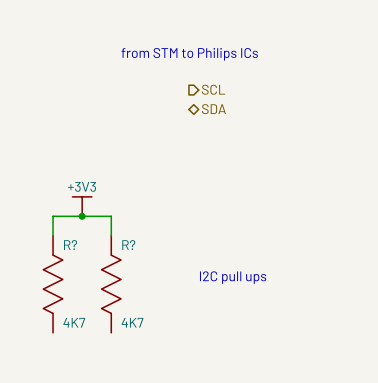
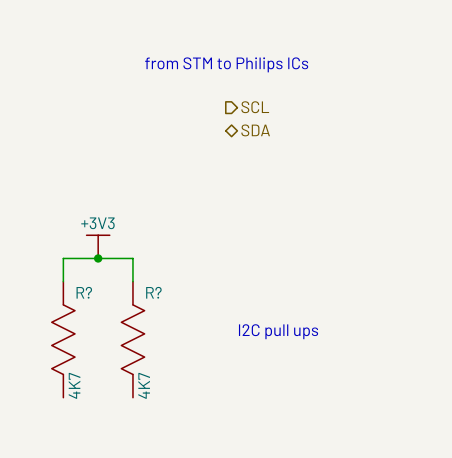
R? value rotation: 0° (74, 322) -> 90° counterclockwise (74, 385)
R? value rotation: 0° (132, 322) -> 90° counterclockwise (144, 385)

